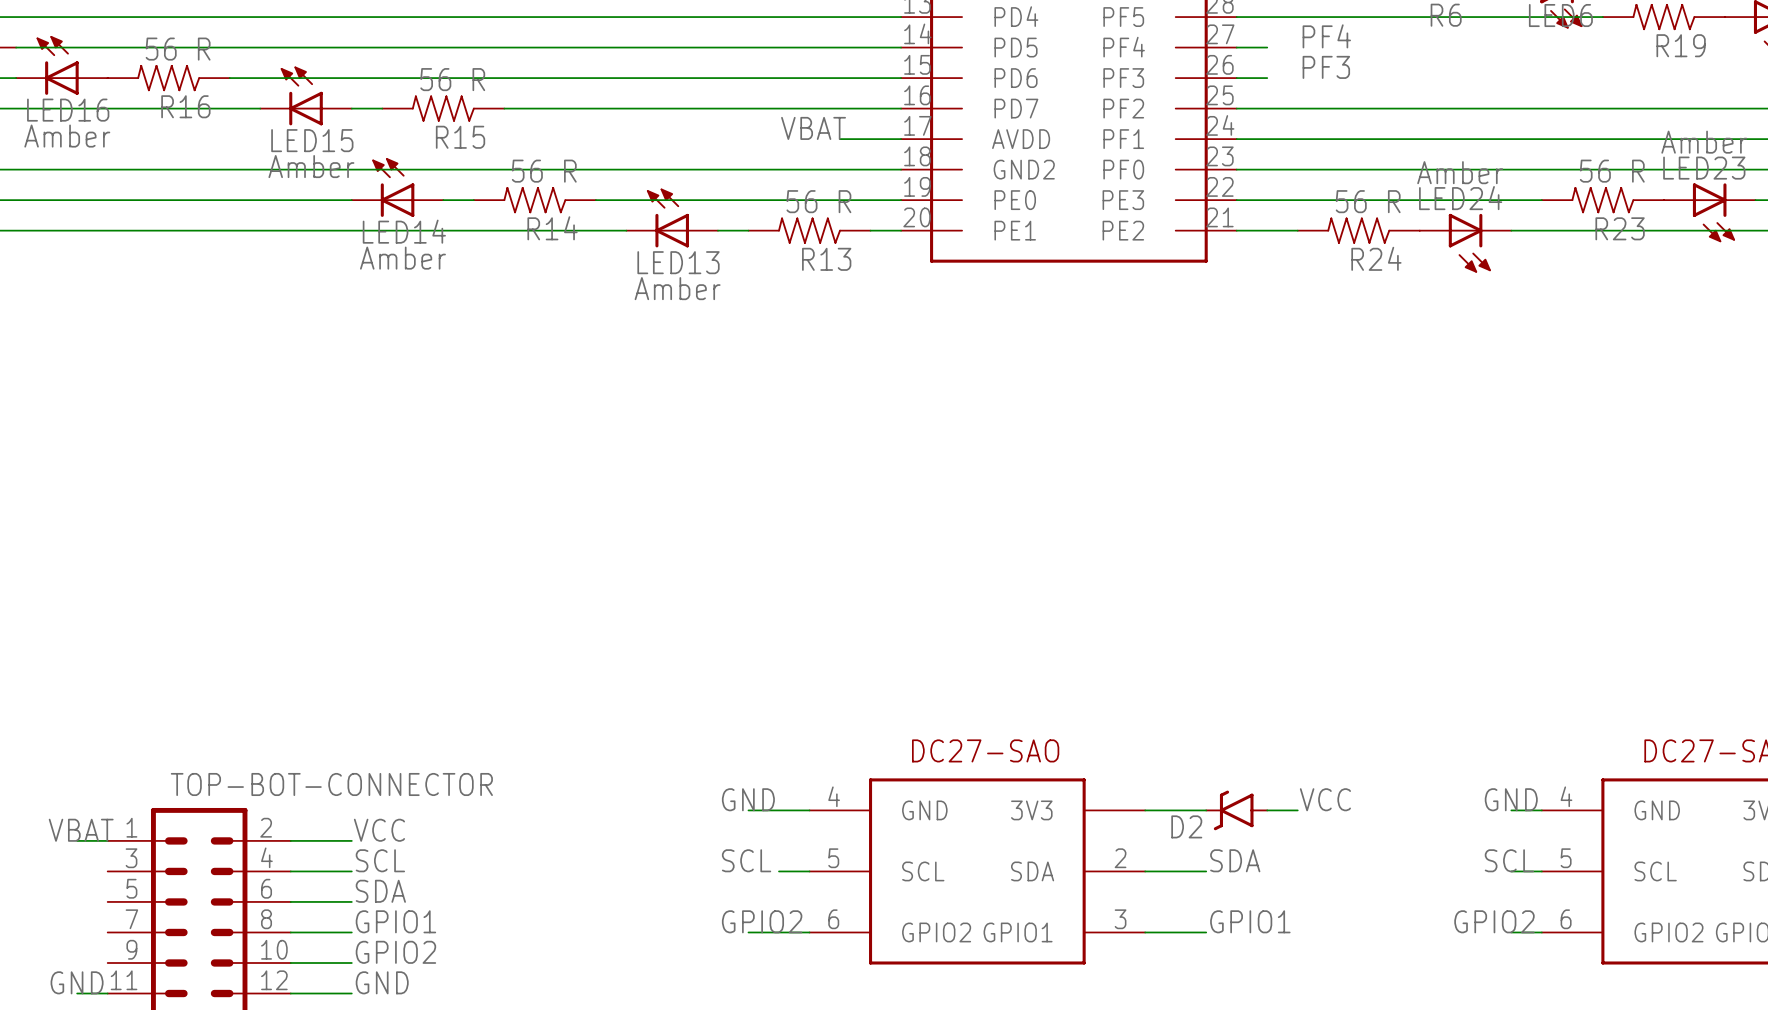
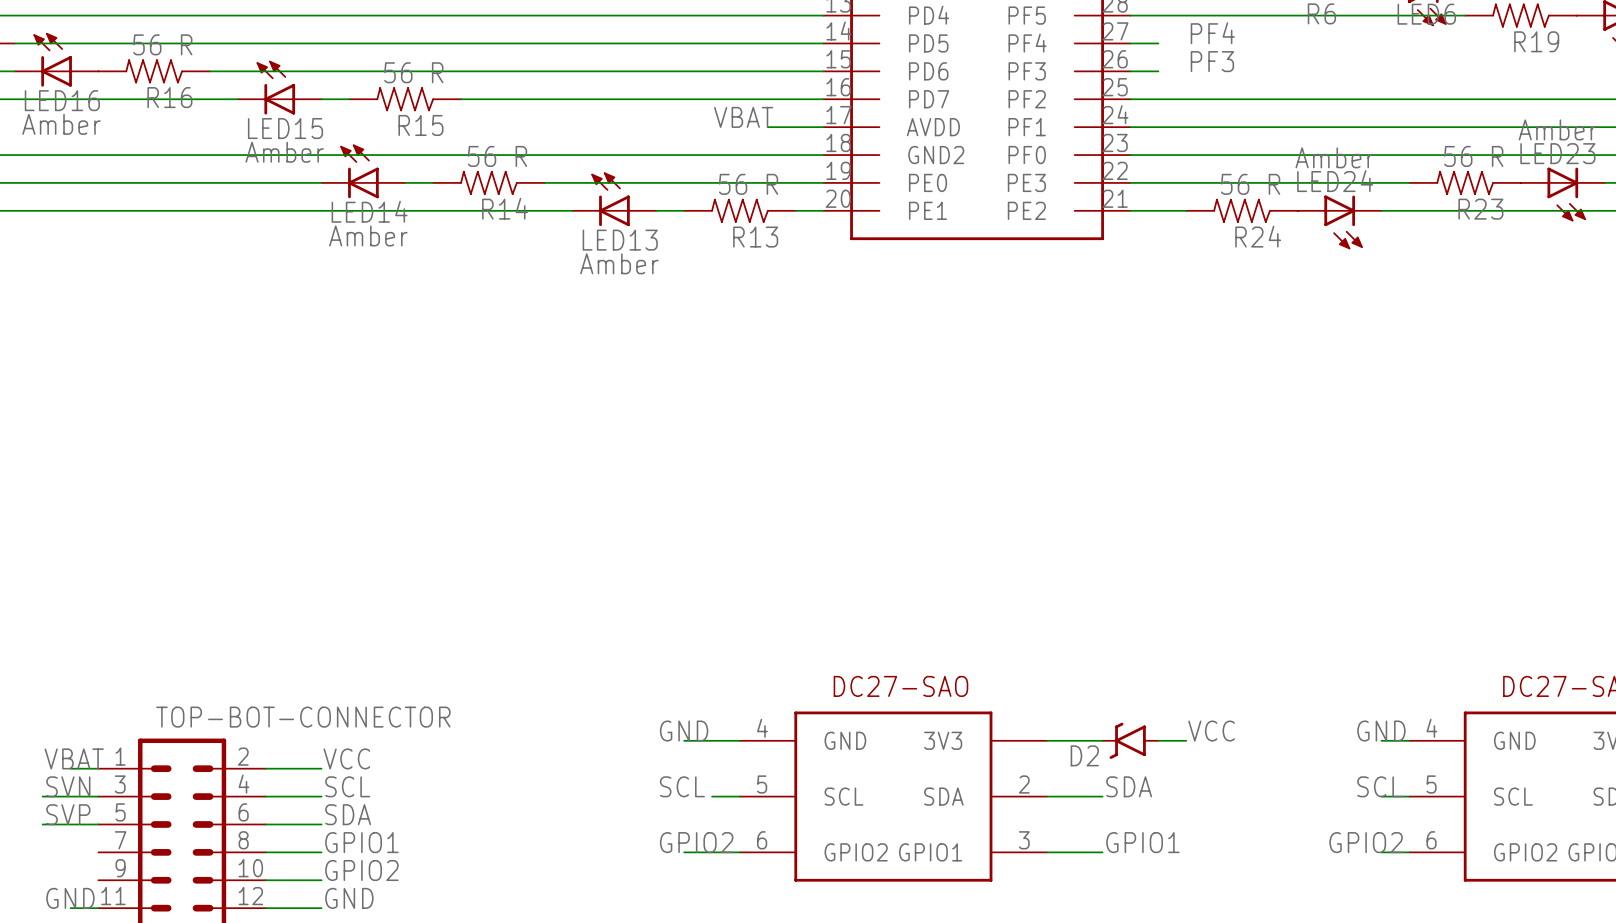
label: none -> SVN (68, 786)
wire: none -> (42, 796) (98, 796)
label: none -> SVP (68, 814)
wire: none -> (42, 824) (98, 824)

